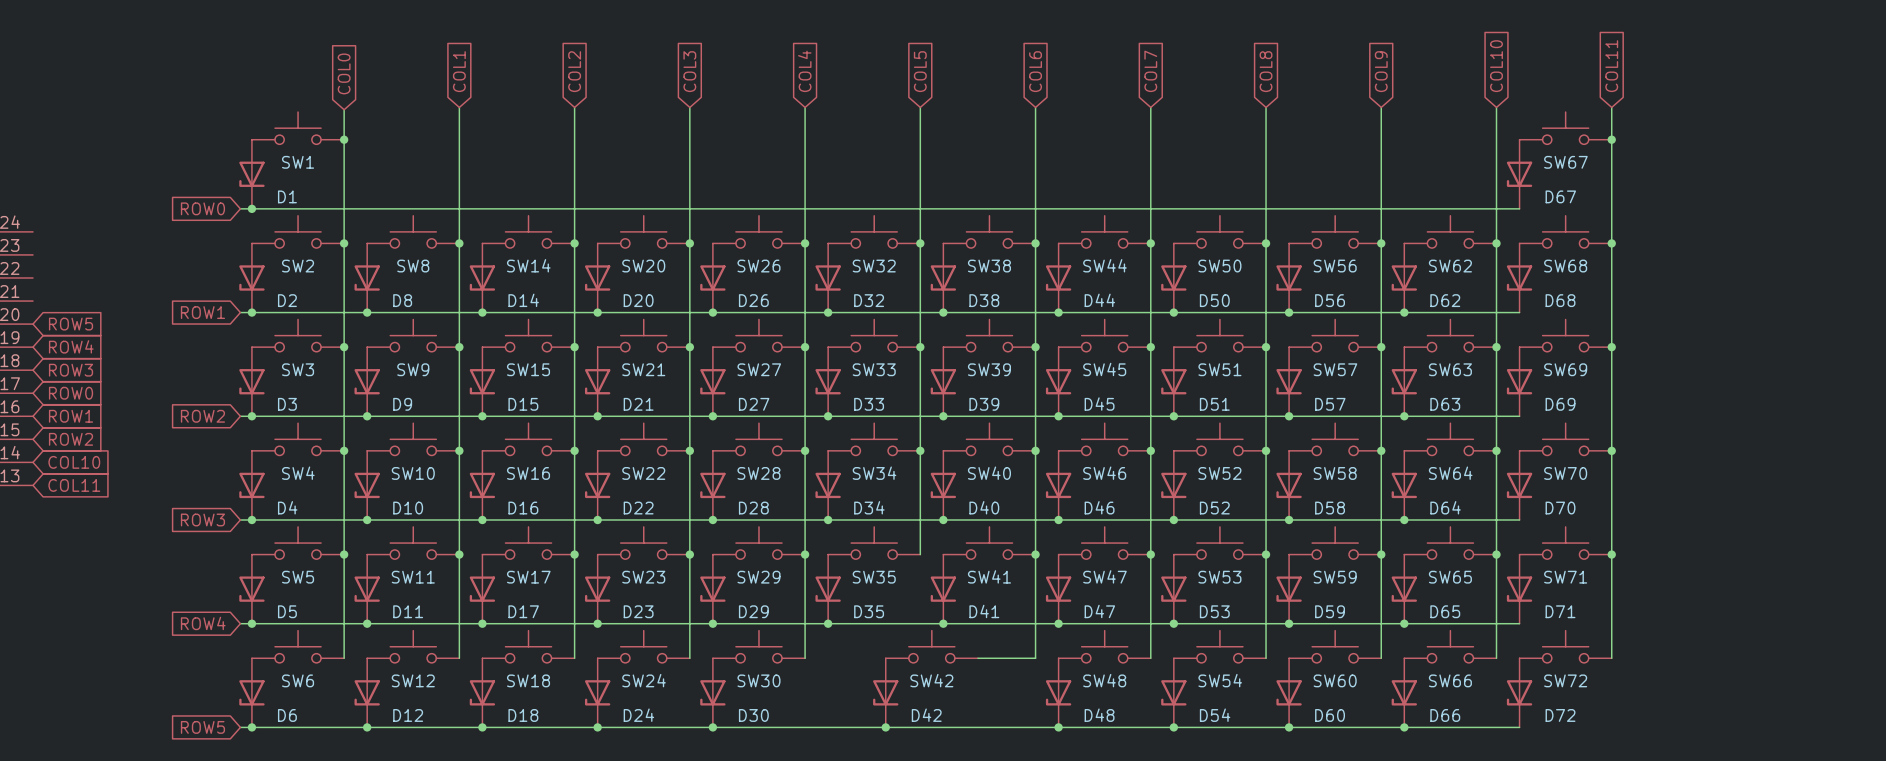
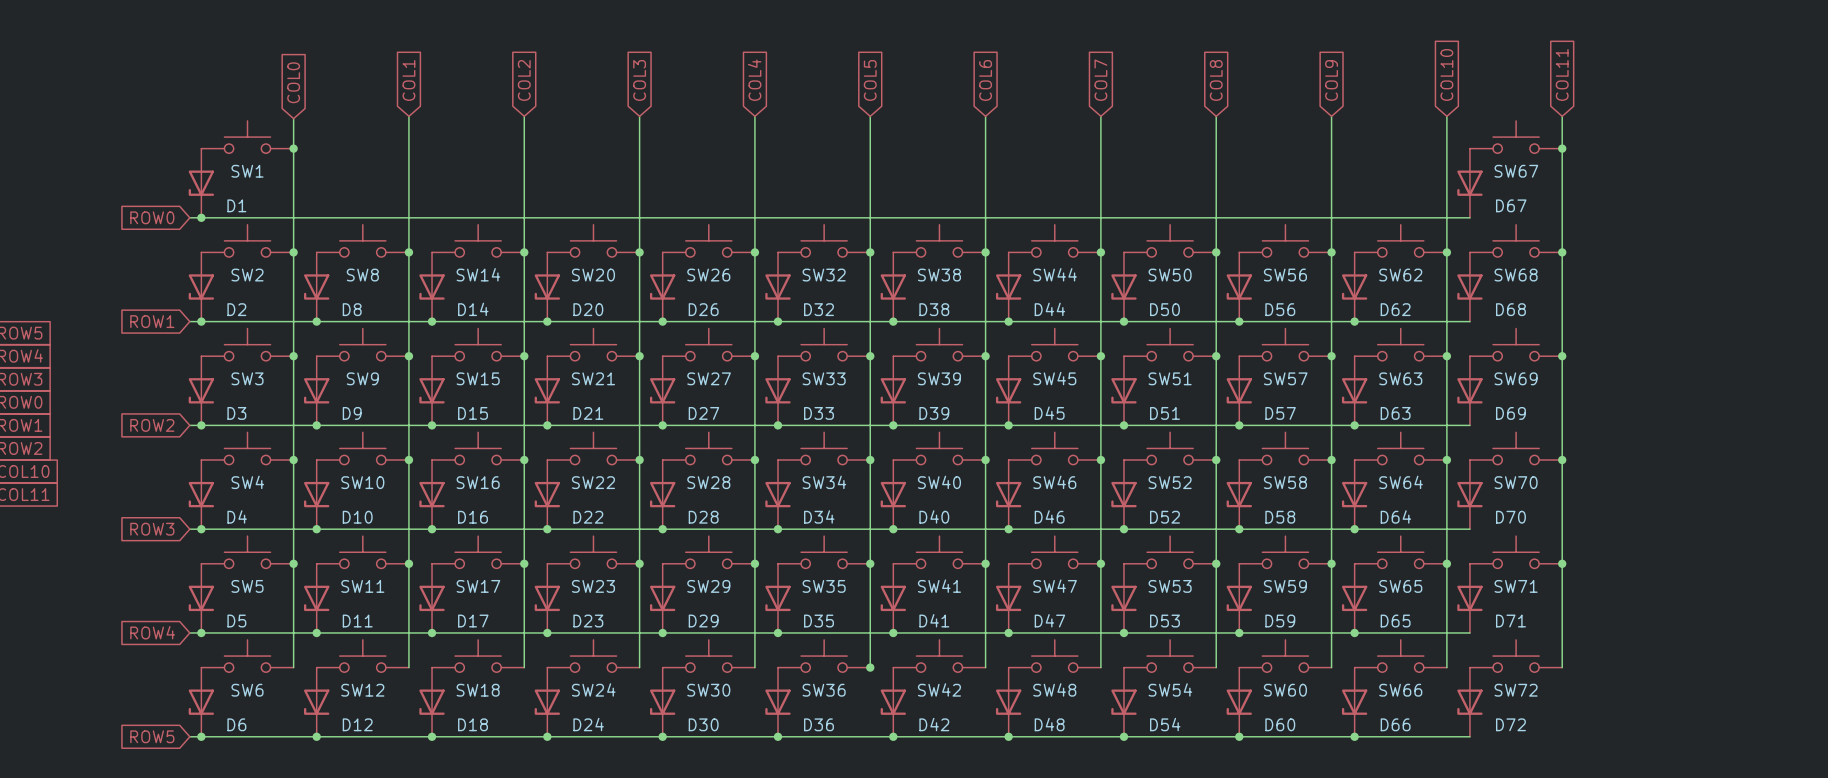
wire: none -> (870, 563) (870, 669)
junction: none -> (870, 563)
SW36: none -> (824, 656)
SW42 position: (931, 646) -> (939, 656)
junction: none -> (870, 667)
wire: (977, 658) (1035, 658) -> none
D36: none -> (777, 702)
D42 position: (885, 692) -> (893, 702)
junction: none -> (777, 736)
junction: (885, 727) -> none
junction: none -> (893, 736)

